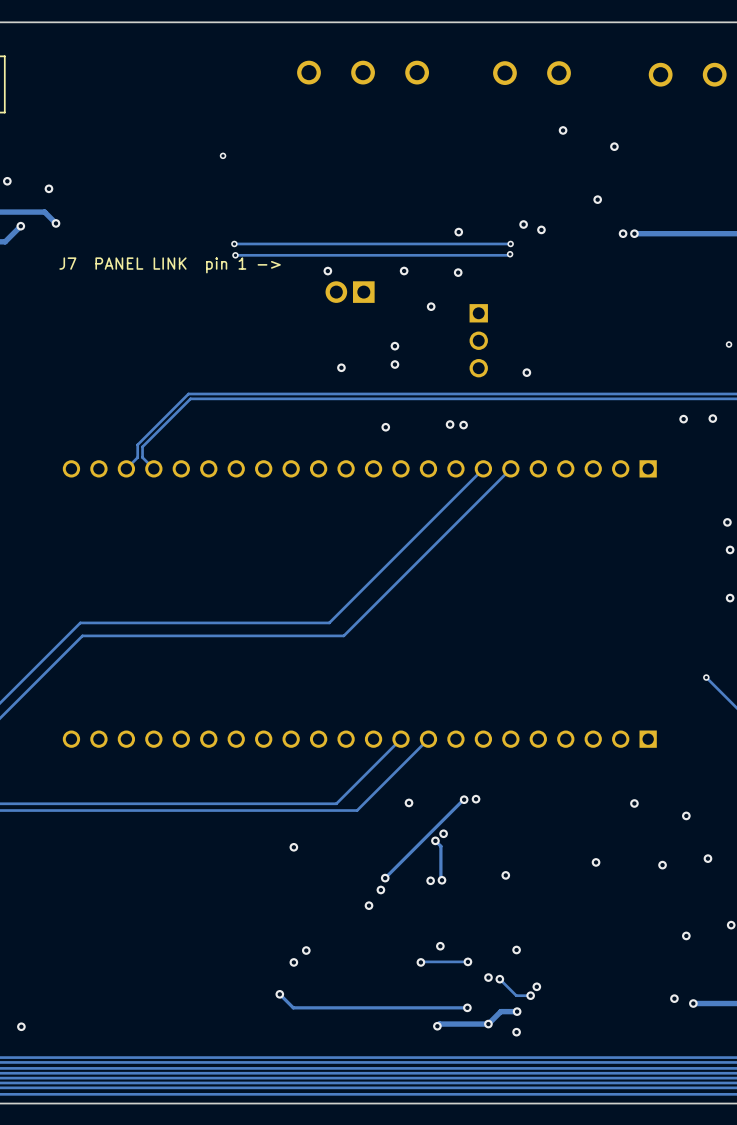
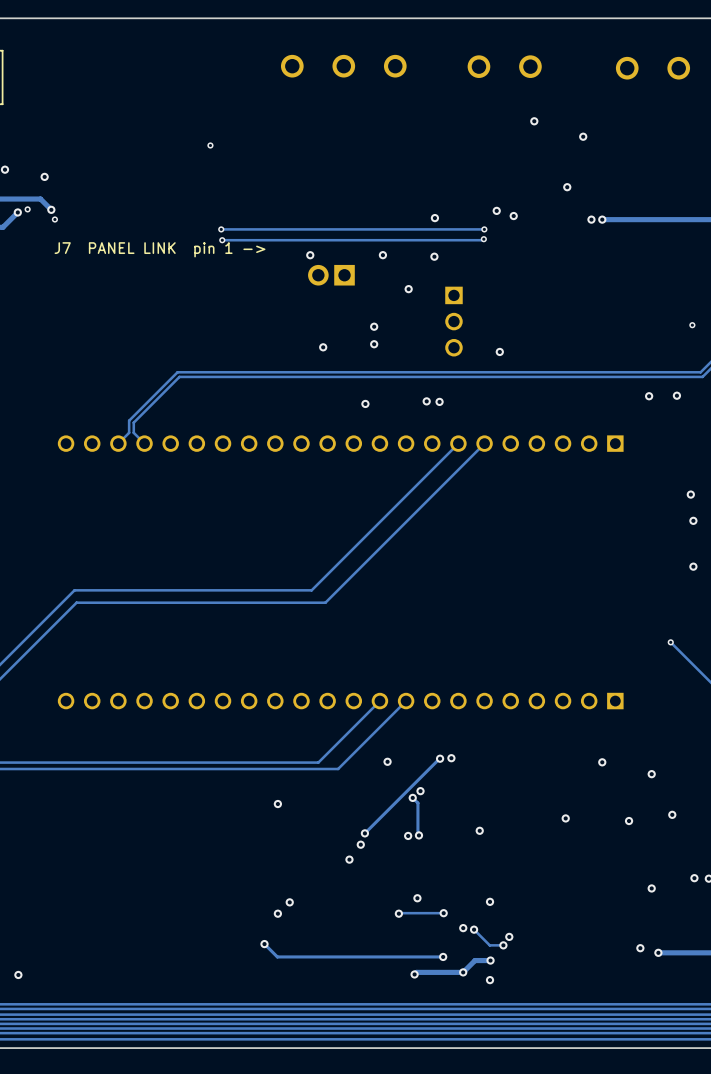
via: none -> (27, 209)
via: none -> (54, 219)

